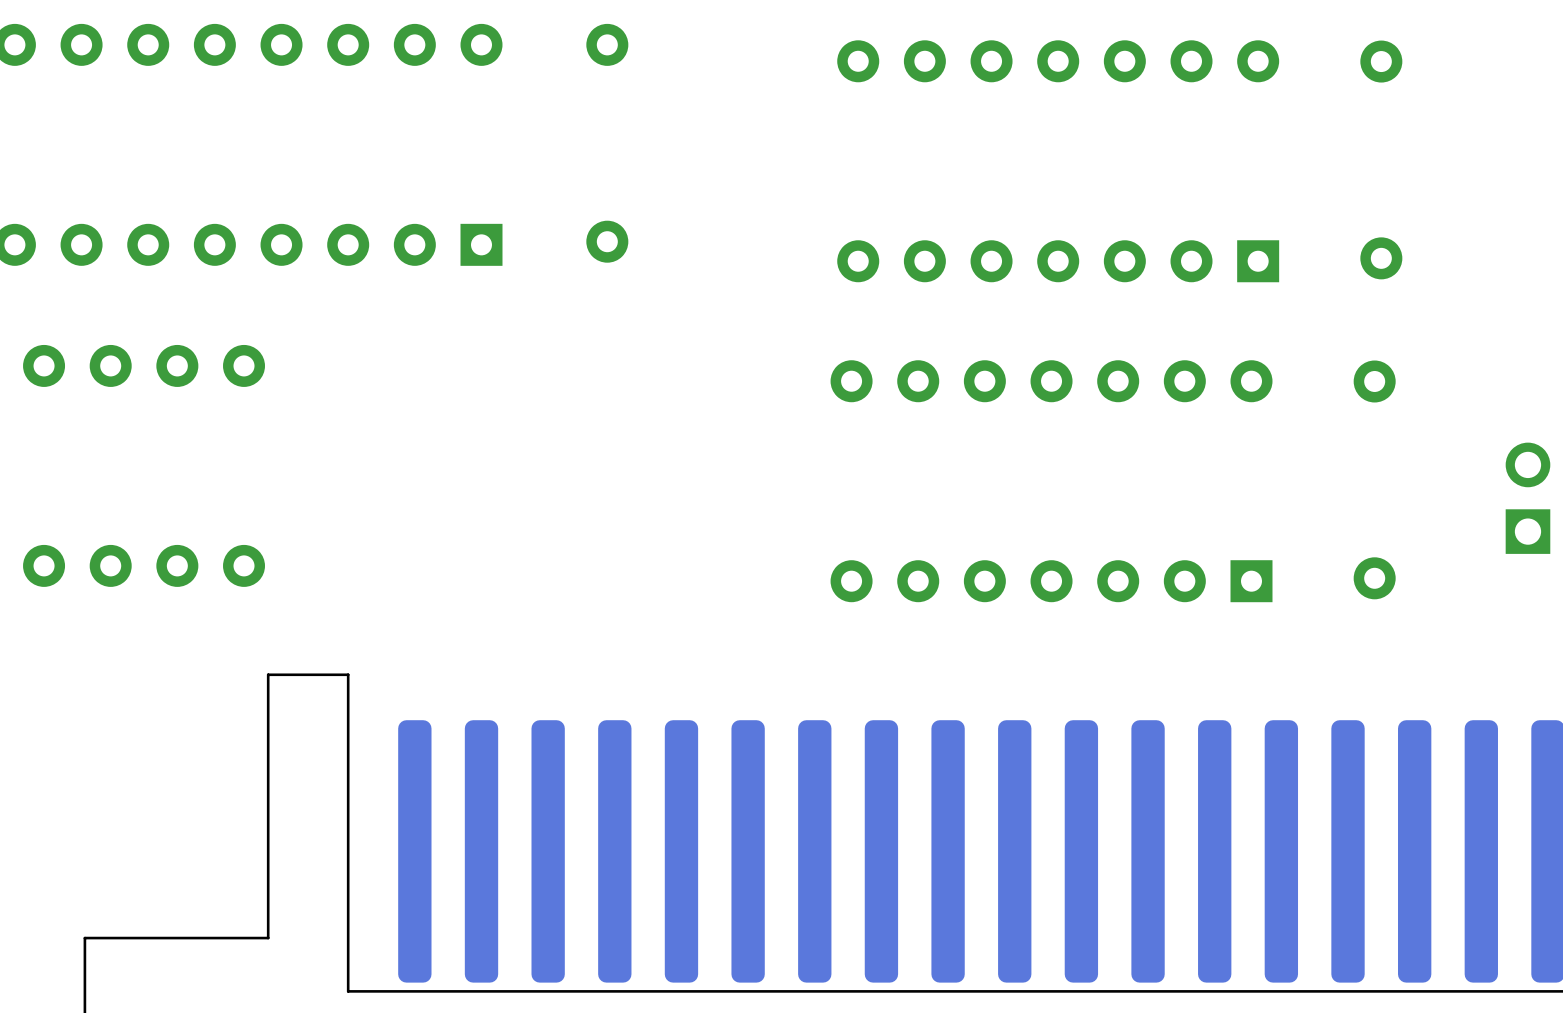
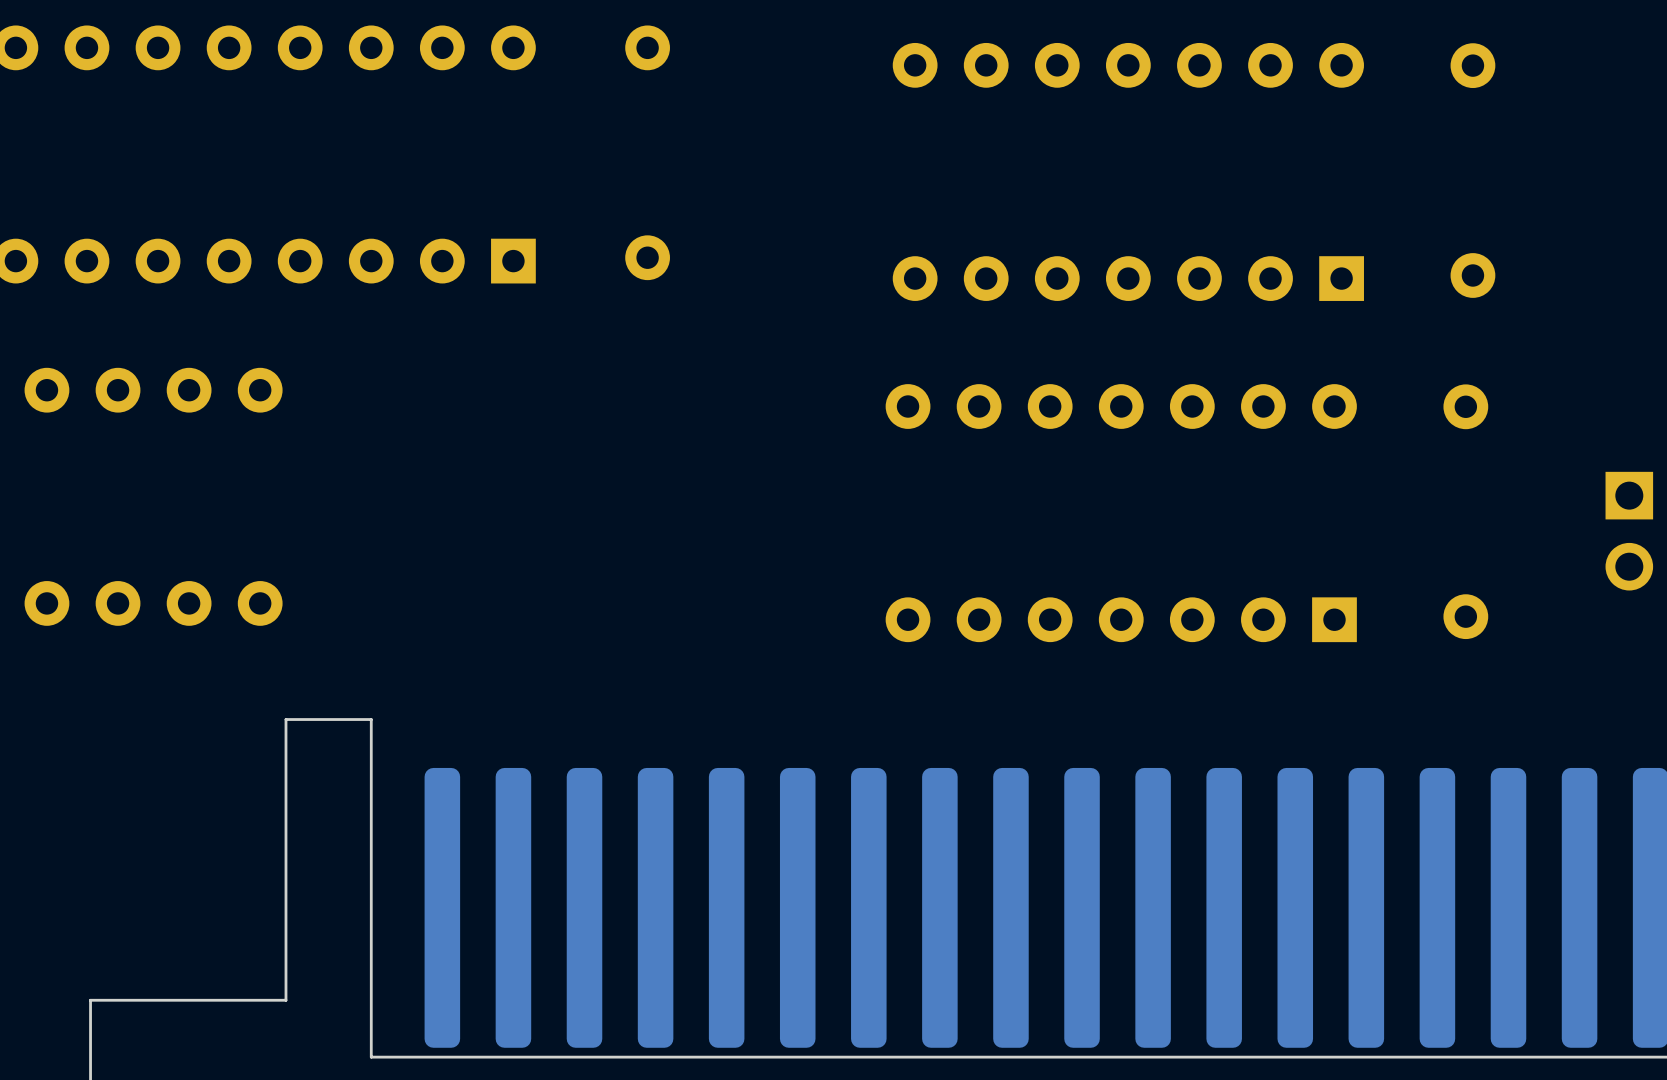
part rotation: 0° (1527, 498) -> 180° (1629, 531)

